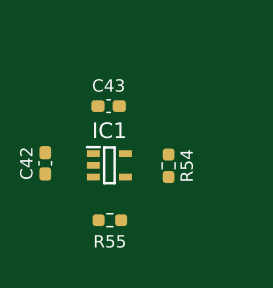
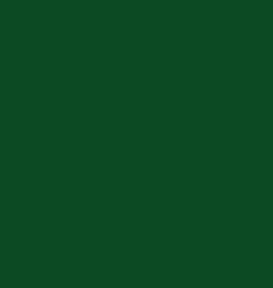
C43: (108, 106) -> none
C42: (45, 163) -> none
IC1: (108, 165) -> none
R54: (168, 165) -> none
R55: (109, 220) -> none

